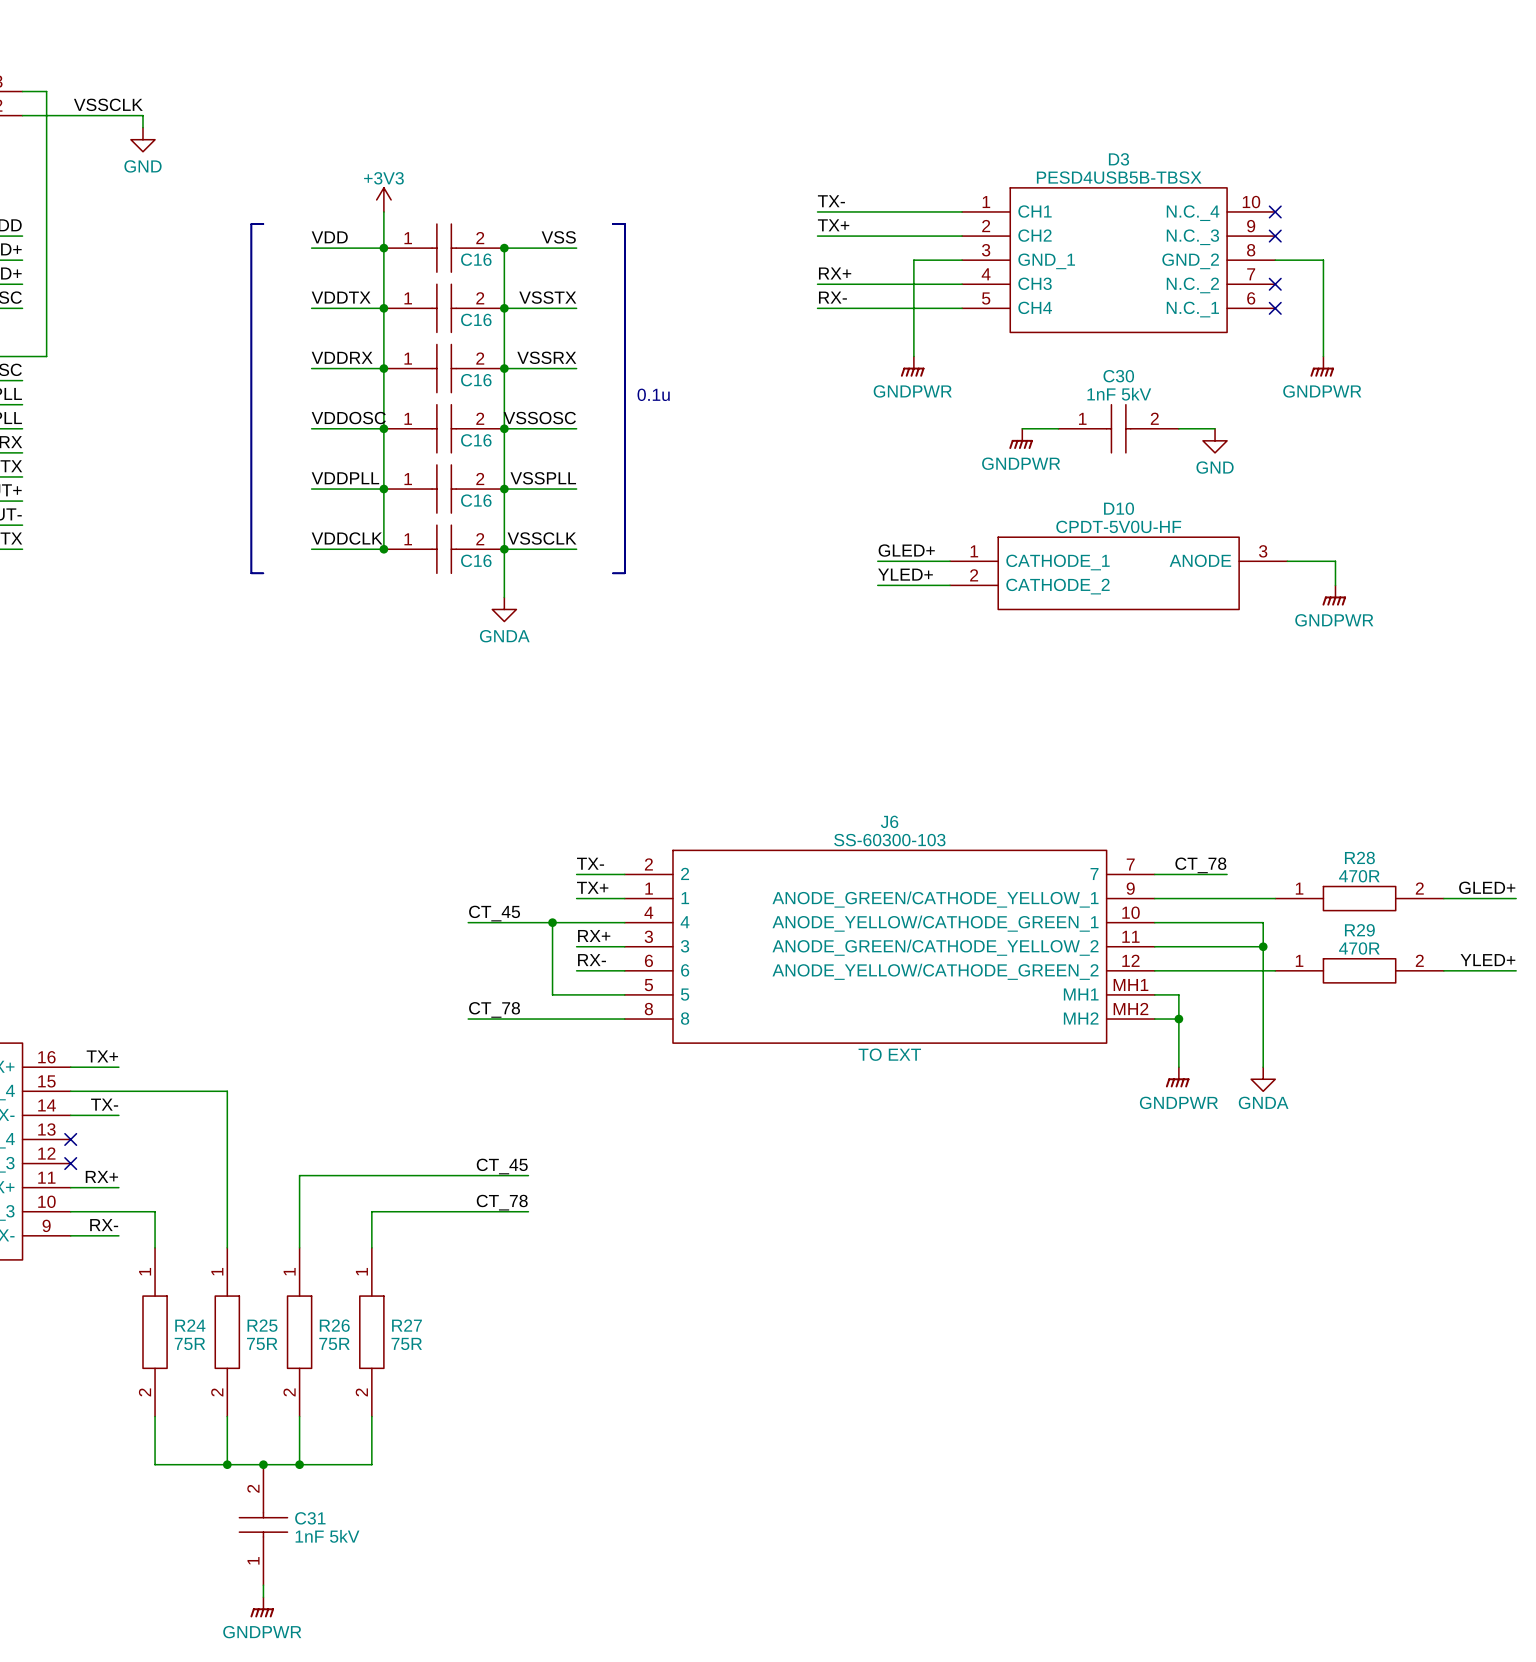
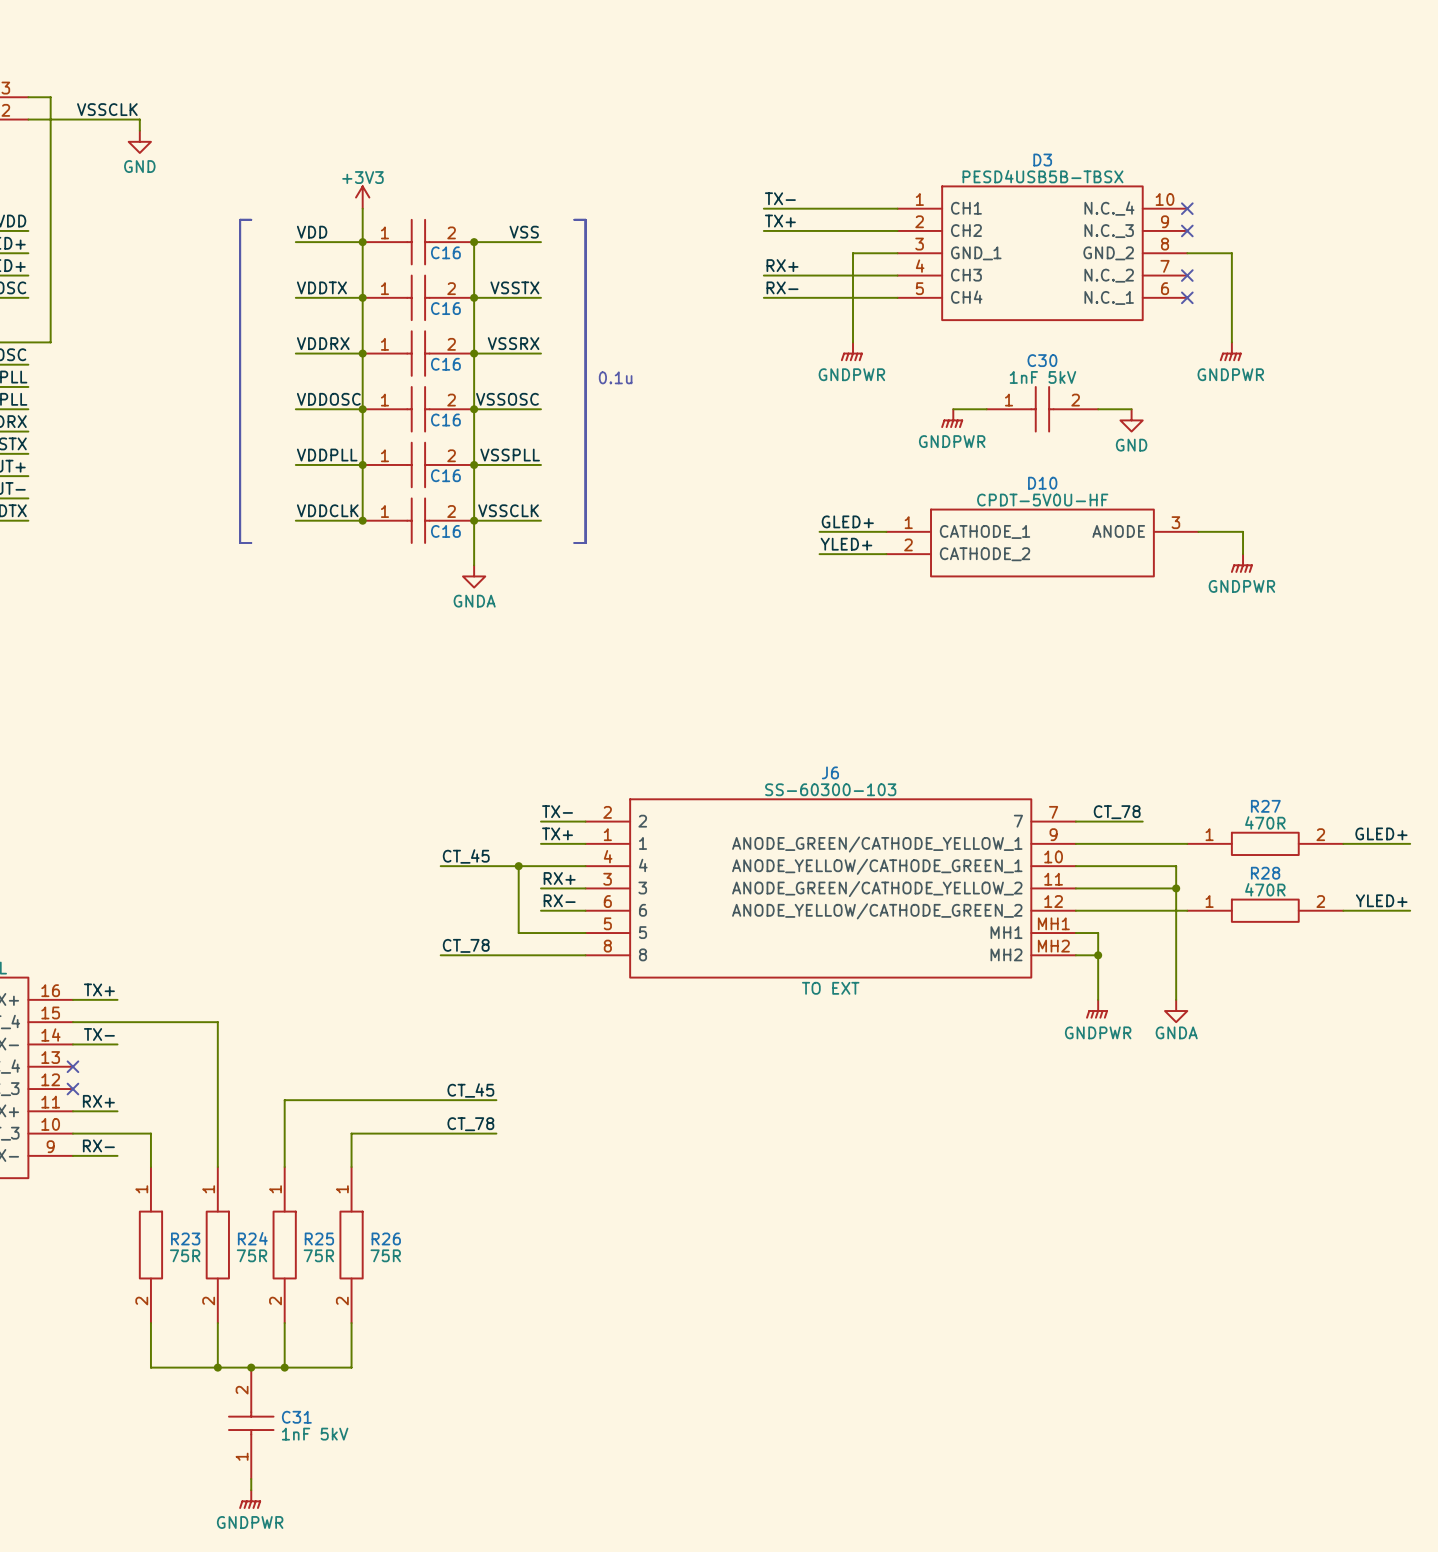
R28 name: R28 (1359, 858) -> R27 (1265, 806)
R29 name: R29 (1359, 930) -> R28 (1265, 873)
R24 name: R24 (190, 1325) -> R23 (185, 1238)
R25 name: R25 (262, 1325) -> R24 (252, 1238)
R26 name: R26 (334, 1325) -> R25 (319, 1238)
R27 name: R27 (406, 1325) -> R26 (386, 1238)

